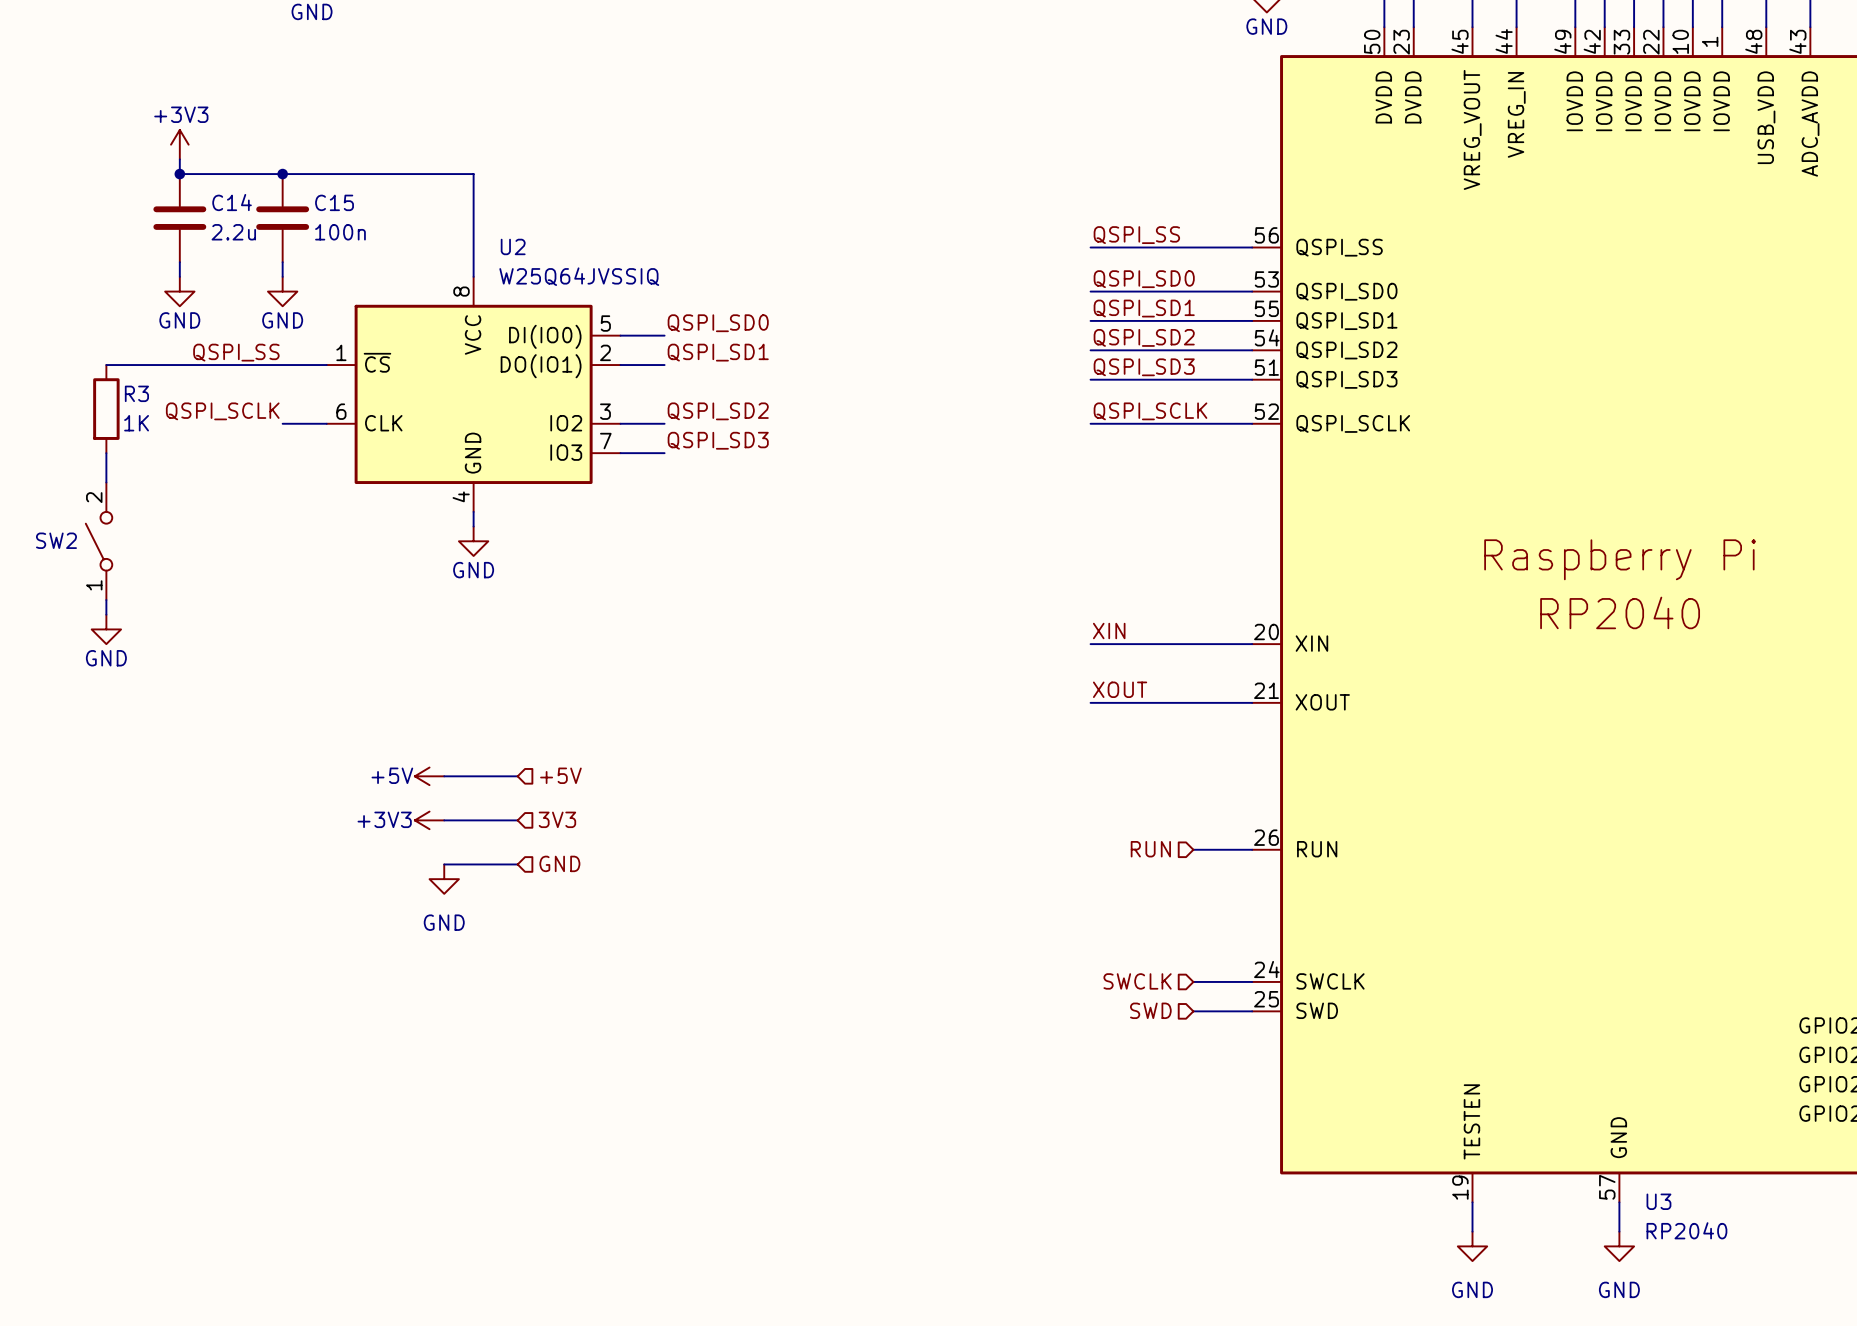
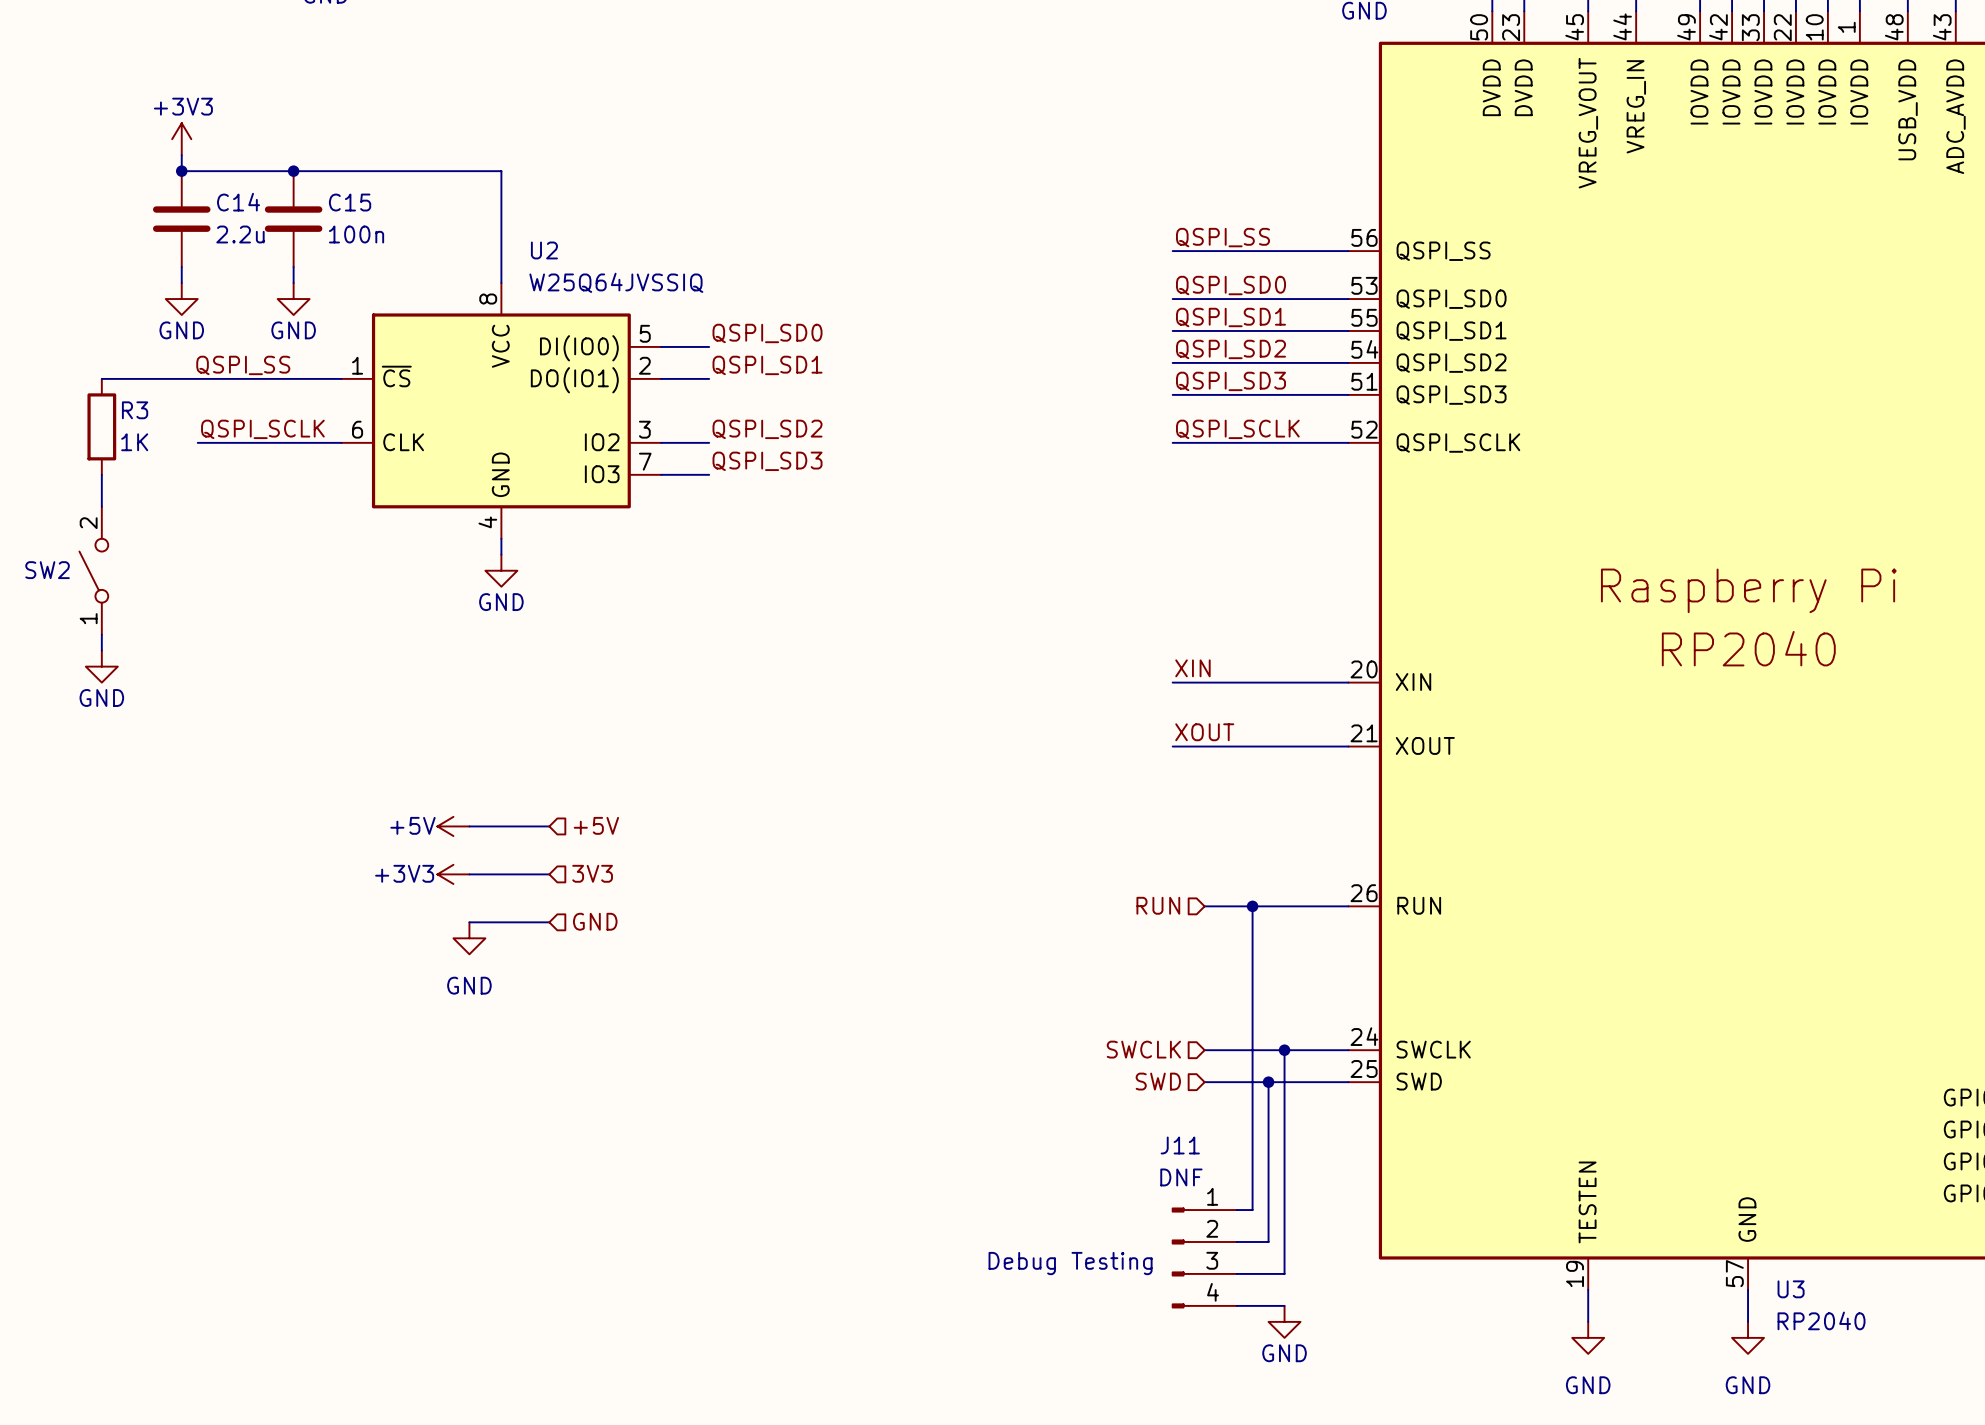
label position: QSPI_SCLK (222, 411) -> QSPI_SCLK (262, 429)
wire: none -> (197, 442) (293, 442)
wire: none -> (1204, 906) (1284, 906)
hierarchical label position: RUN (1150, 849) -> RUN (1158, 905)
wire: none -> (1252, 906) (1252, 1210) (1236, 1210)
junction: none -> (1252, 906)
wire: none -> (1204, 1050) (1284, 1050) (1284, 1273) (1236, 1273)
hierarchical label position: SWCLK (1137, 981) -> SWCLK (1143, 1049)
junction: none -> (1284, 1050)
hierarchical label position: SWD (1150, 1010) -> SWD (1158, 1081)
wire: none -> (1204, 1082) (1284, 1082)
wire: none -> (1268, 1082) (1268, 1241) (1236, 1241)
junction: none -> (1268, 1082)
J11: none -> DNF (1204, 1257)
text: none -> Debug Testing (1070, 1263)
wire: none -> (1236, 1305) (1284, 1305)
power symbol: none -> GND (1284, 1321)

